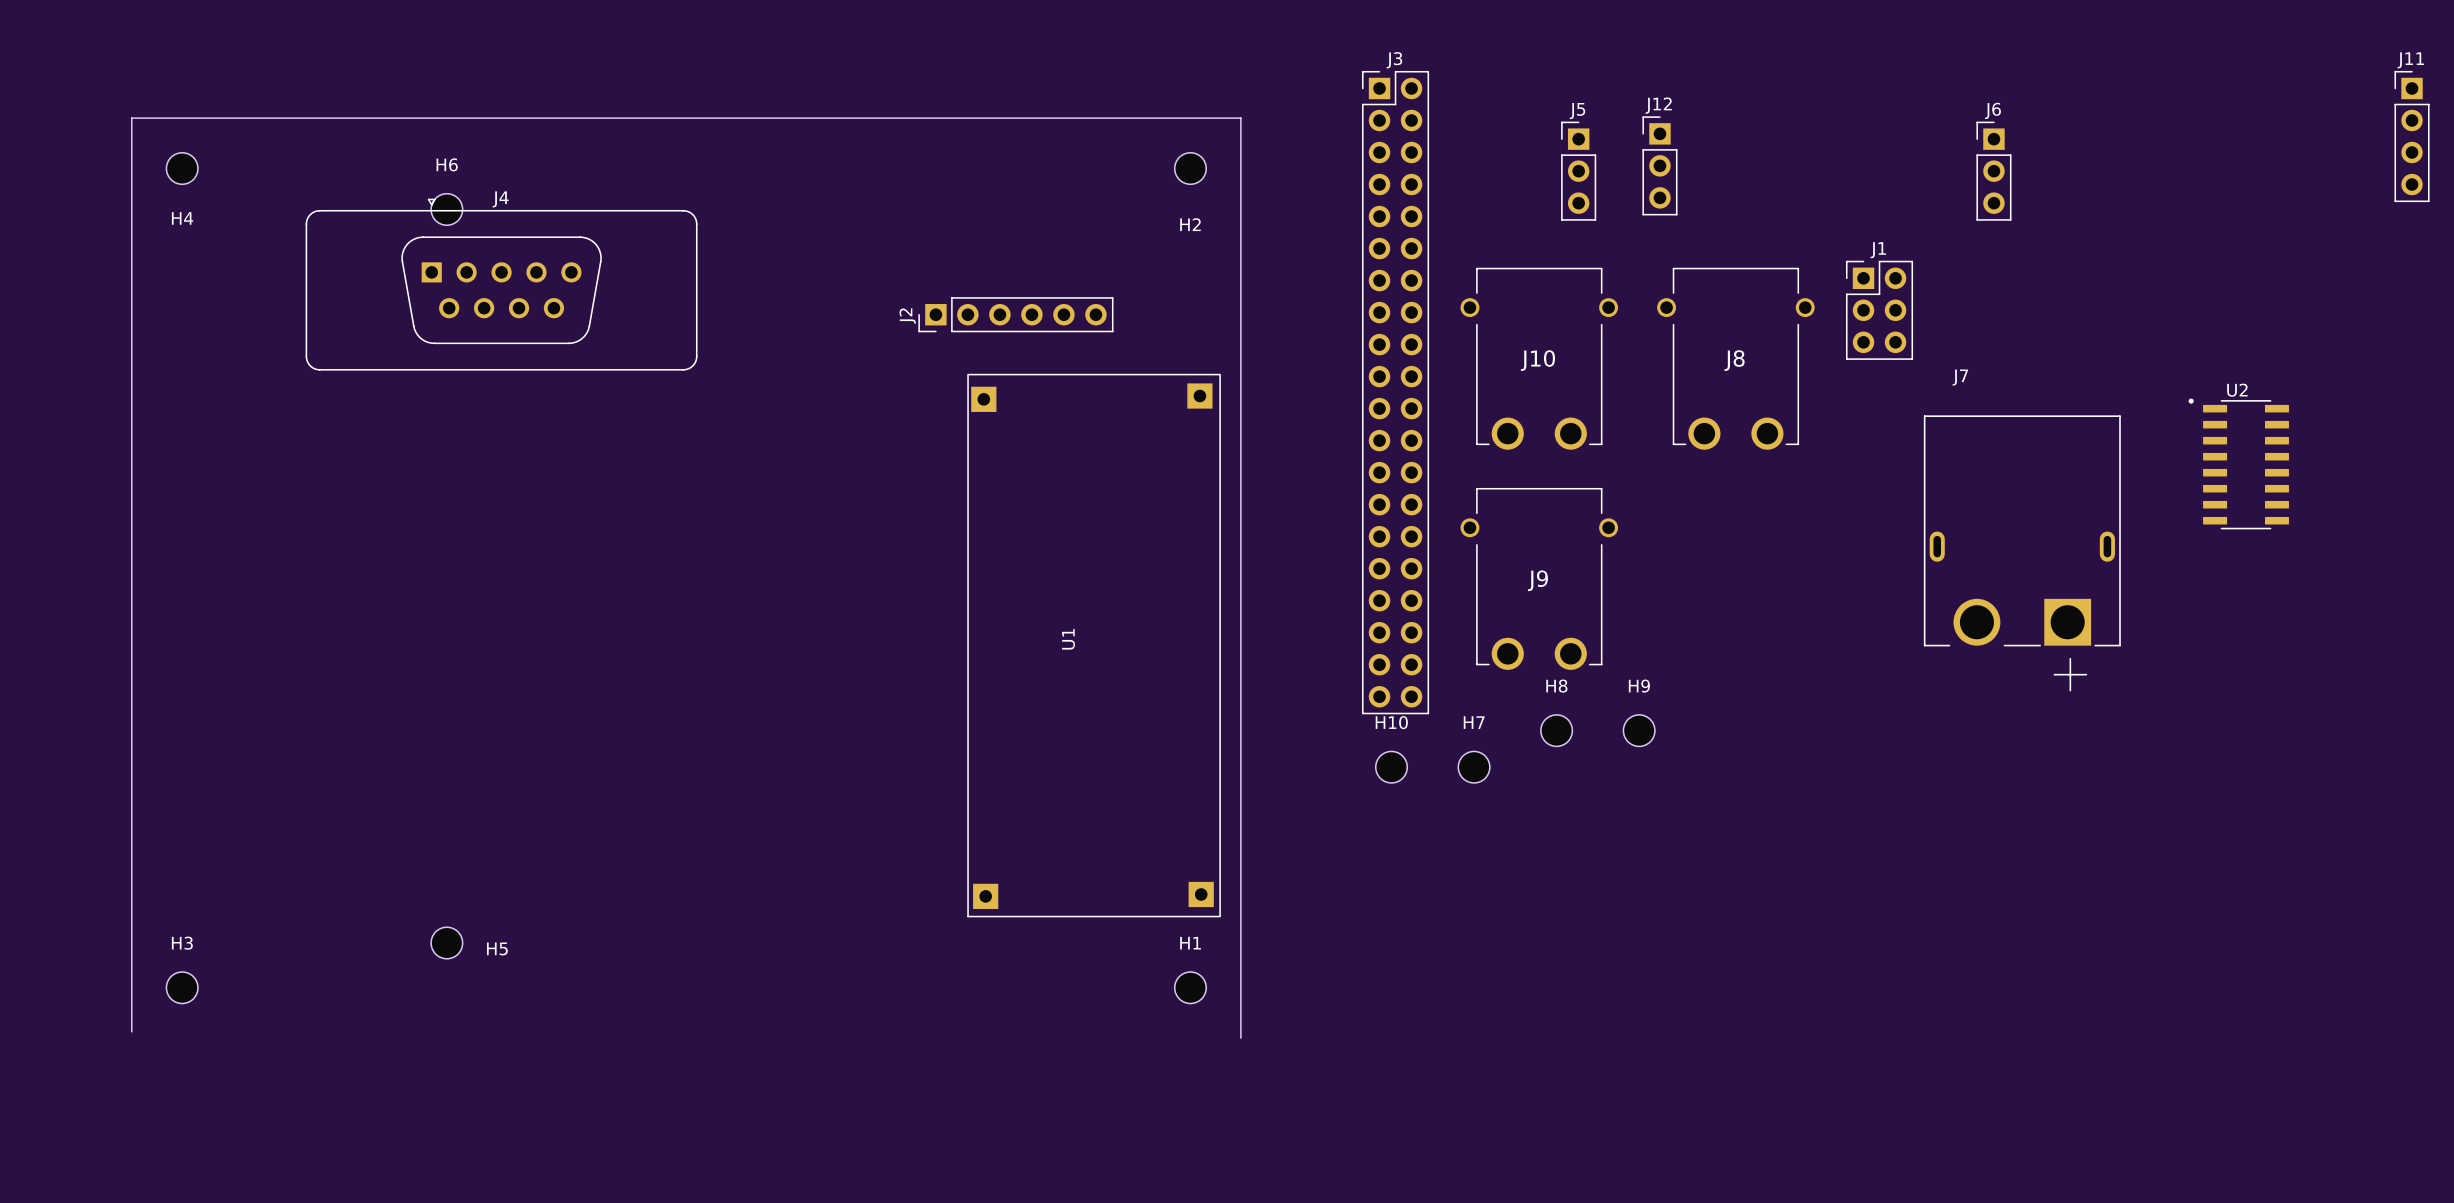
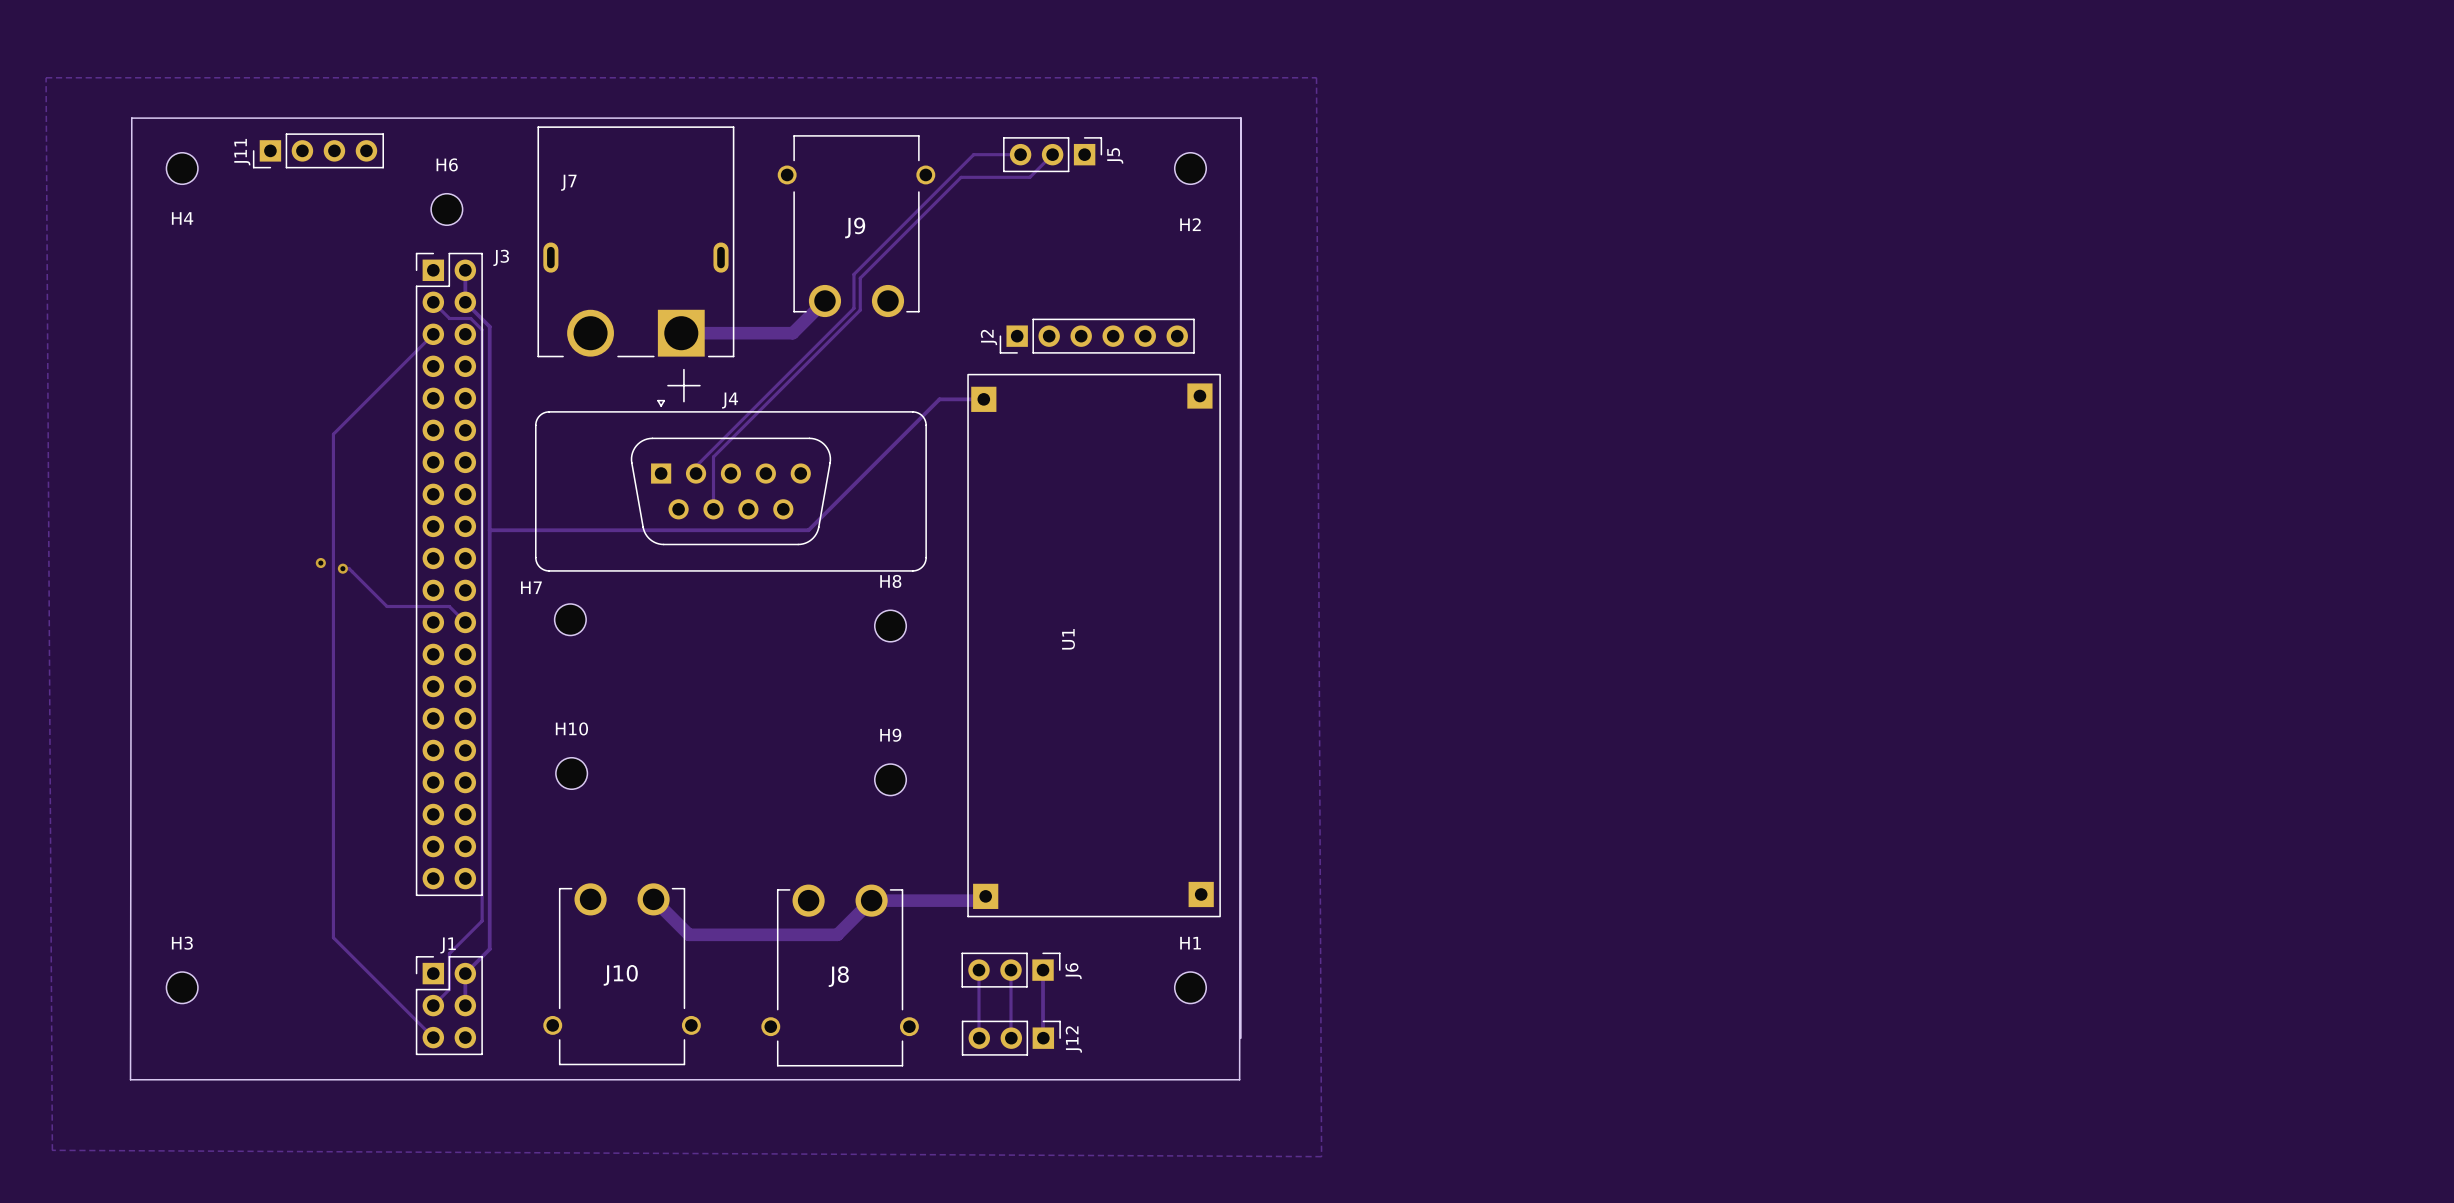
J3 name position: J3 (1394, 60) -> J3 (501, 257)
zone outline: none -> (46, 77) (52, 1150) (1321, 1156) (1316, 77) (46, 77)
board edge: (131, 118) (131, 1031) -> (131, 118) (130, 1079) (1239, 1079) (1240, 118)
J11 rotation: 0° (2412, 136) -> 90° counterclockwise (318, 150)
J11 position: (2412, 136) -> (318, 150)
track: none -> (1020, 154) (973, 154) (853, 274) (853, 308) (696, 466) (696, 473)
track: none -> (1052, 154) (1029, 177) (961, 177) (860, 278) (860, 310) (713, 456) (713, 509)
J12 rotation: 0° (1659, 165) -> 90° clockwise (1011, 1038)
J12 position: (1659, 165) -> (1011, 1038)
J5 rotation: 0° (1578, 171) -> 90° clockwise (1052, 154)
J5 position: (1578, 171) -> (1052, 154)
J6 rotation: 0° (1993, 171) -> 90° clockwise (1011, 970)
J6 position: (1993, 171) -> (1011, 970)
track: none -> (465, 270) (465, 302) (489, 326) (489, 949) (465, 973) (465, 1005)
J4 position: (501, 284) -> (730, 485)
track: none -> (824, 301) (792, 333) (681, 333)
track: none -> (433, 302) (449, 318) (470, 318) (482, 329) (482, 920) (449, 953) (449, 989) (433, 1005)
J1 position: (1879, 310) -> (449, 1005)
J2 position: (1015, 314) -> (1097, 336)
track: none -> (433, 334) (333, 434) (333, 937) (433, 1037)
J10 rotation: 0° (1539, 358) -> 180° (622, 974)
J10 position: (1539, 358) -> (622, 974)
J8 rotation: 0° (1735, 358) -> 180° (840, 975)
J8 position: (1735, 358) -> (840, 975)
J7 name position: J7 (1960, 377) -> J7 (568, 182)
J3 position: (1395, 392) -> (449, 574)
track: none -> (983, 399) (939, 399) (808, 530) (489, 530)
U2: (2238, 463) -> none
J7 position: (2022, 553) -> (635, 264)
via: none -> (320, 563)
track: none -> (342, 568) (349, 568) (387, 606) (449, 606) (465, 622)
via: none -> (342, 568)
J9 position: (1539, 578) -> (856, 226)
H7 name position: H7 (1474, 722) -> H7 (531, 587)
H8 position: (1556, 730) -> (890, 626)
H9 position: (1639, 730) -> (890, 779)
H10 position: (1391, 767) -> (571, 773)
H7 position: (1474, 767) -> (570, 619)
track: none -> (985, 896) (981, 900) (871, 900) (837, 934) (689, 934) (653, 899)
H5: (446, 943) -> none
track: none -> (978, 970) (979, 1038)
track: none -> (1011, 970) (1011, 1038)
track: none -> (1043, 970) (1043, 1038)

